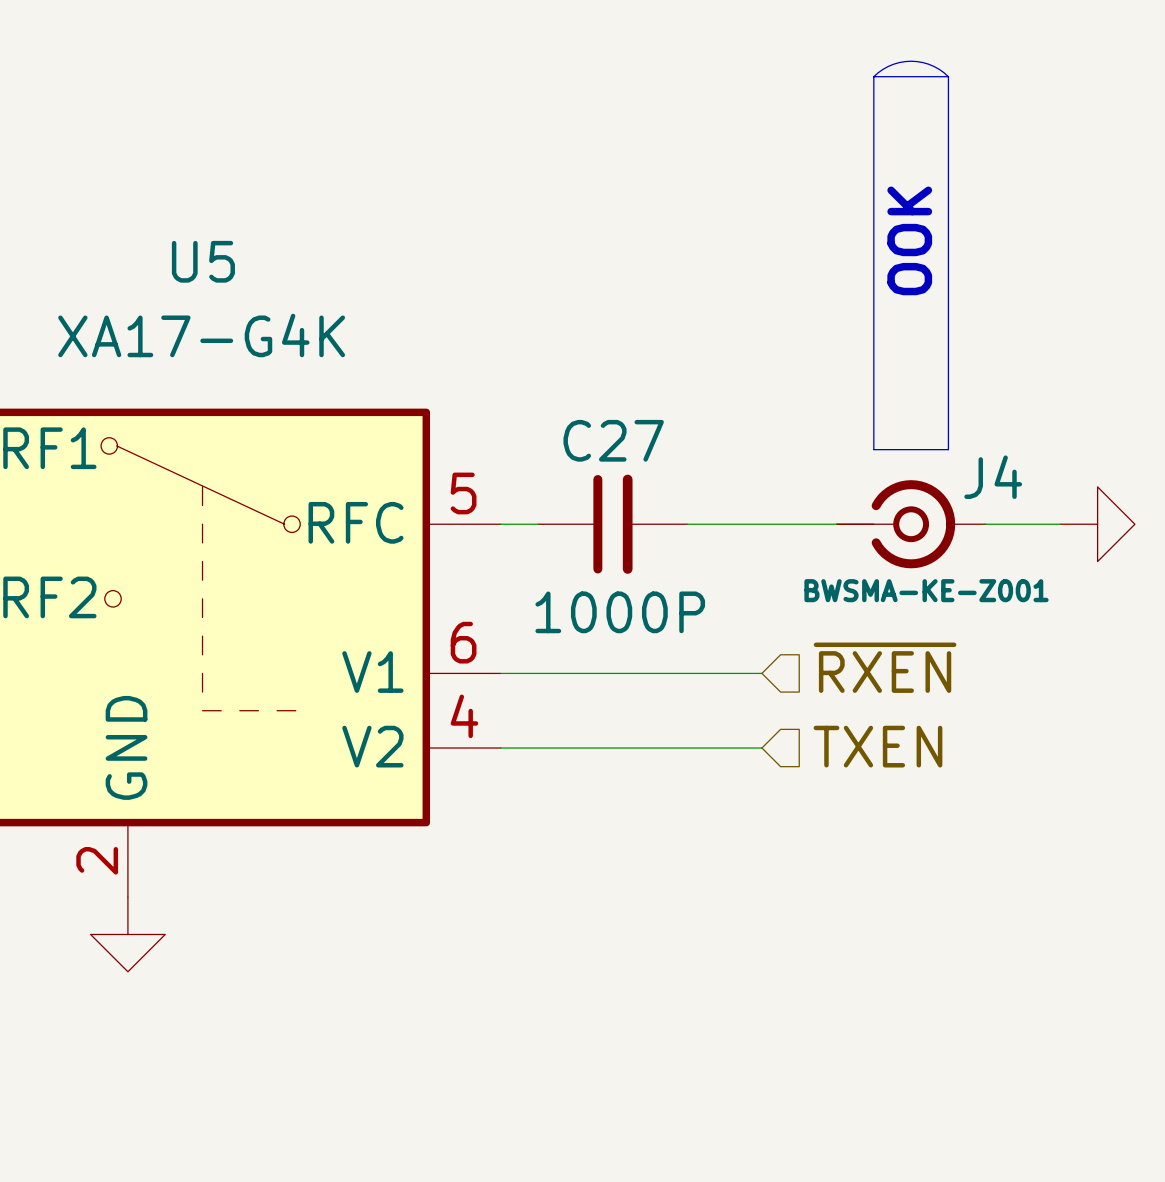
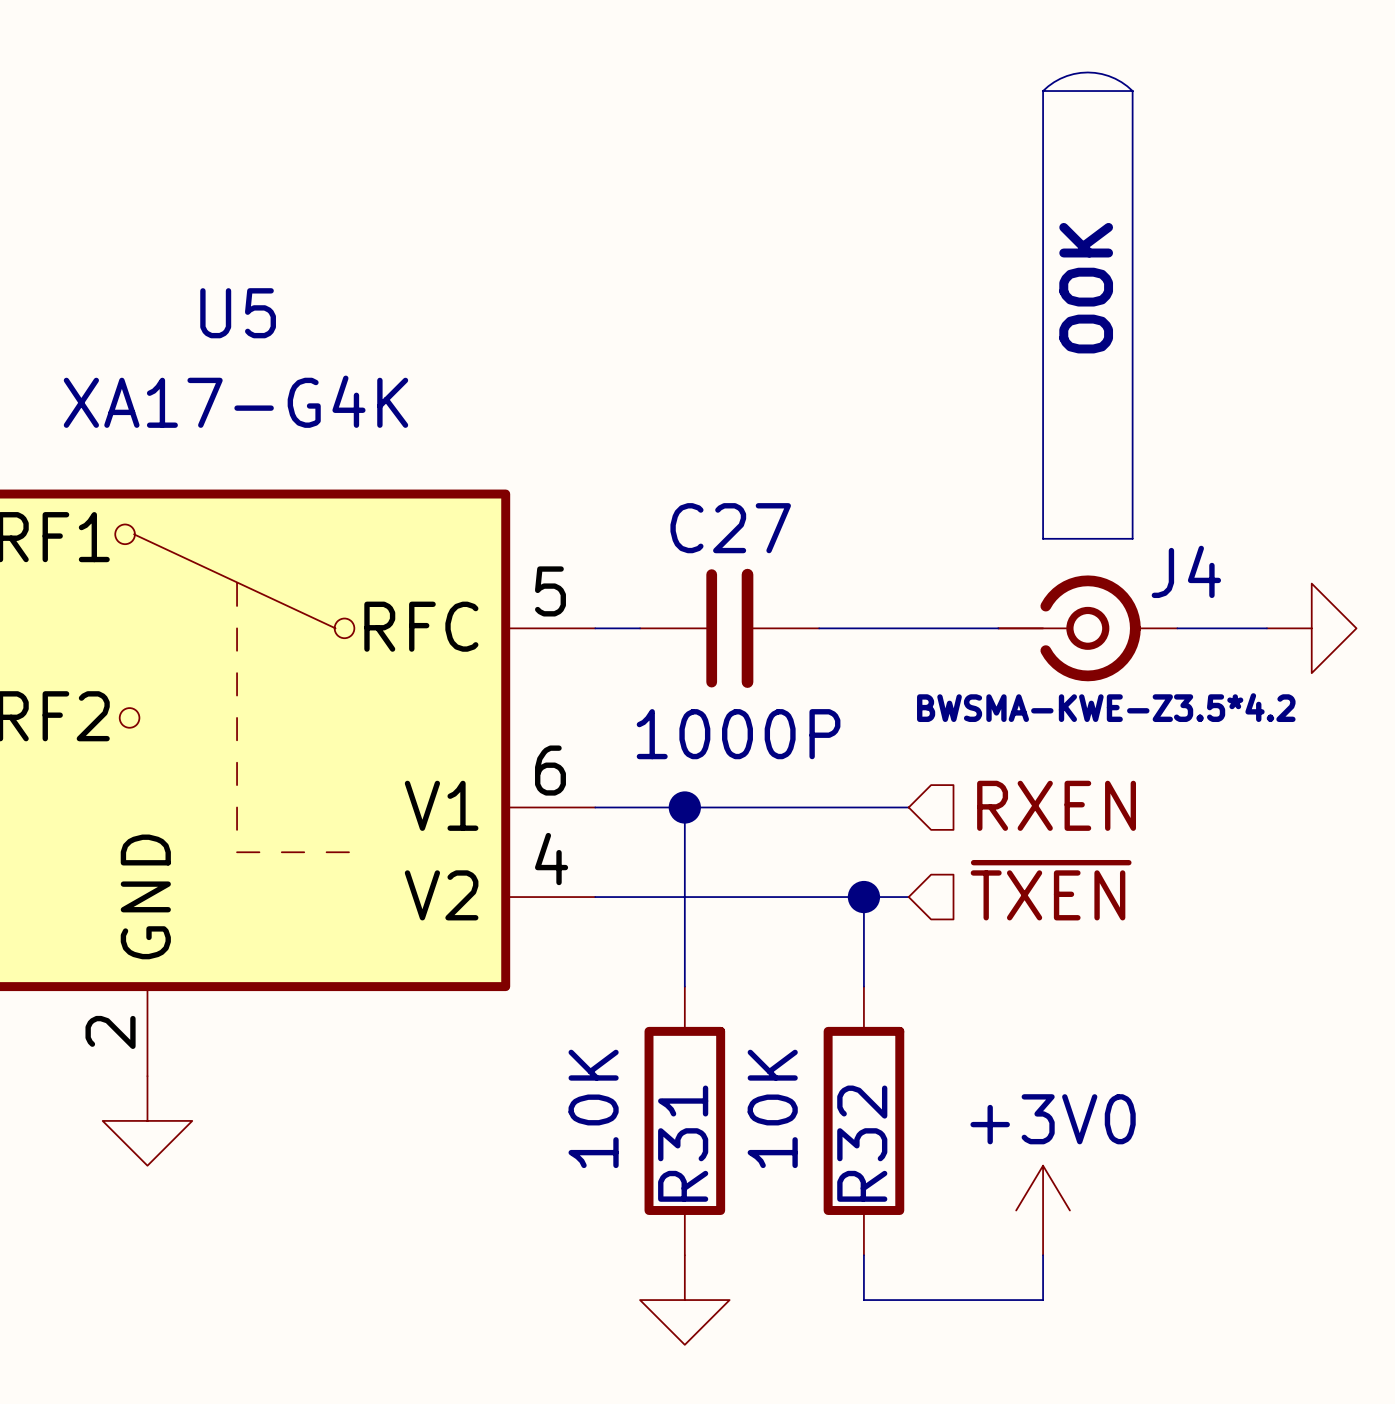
J4 text: BWSMA-KE-Z001 (926, 590) -> BWSMA-KWE-Z3.5*4.2 (1106, 707)
hierarchical label: ~{RXEN} (885, 667) -> RXEN (1056, 805)
wire: none -> (684, 807) (684, 986)
junction: none -> (684, 807)
hierarchical label: TXEN (877, 746) -> ~{TXEN} (1051, 890)
wire: none -> (863, 897) (863, 986)
junction: none -> (863, 897)
R31: none -> 10K (684, 1120)
R32: none -> 10K (863, 1120)
power symbol: none -> +3V0 (1043, 1210)
wire: none -> (863, 1255) (863, 1300) (1043, 1300) (1043, 1255)
power symbol: none -> (684, 1300)

